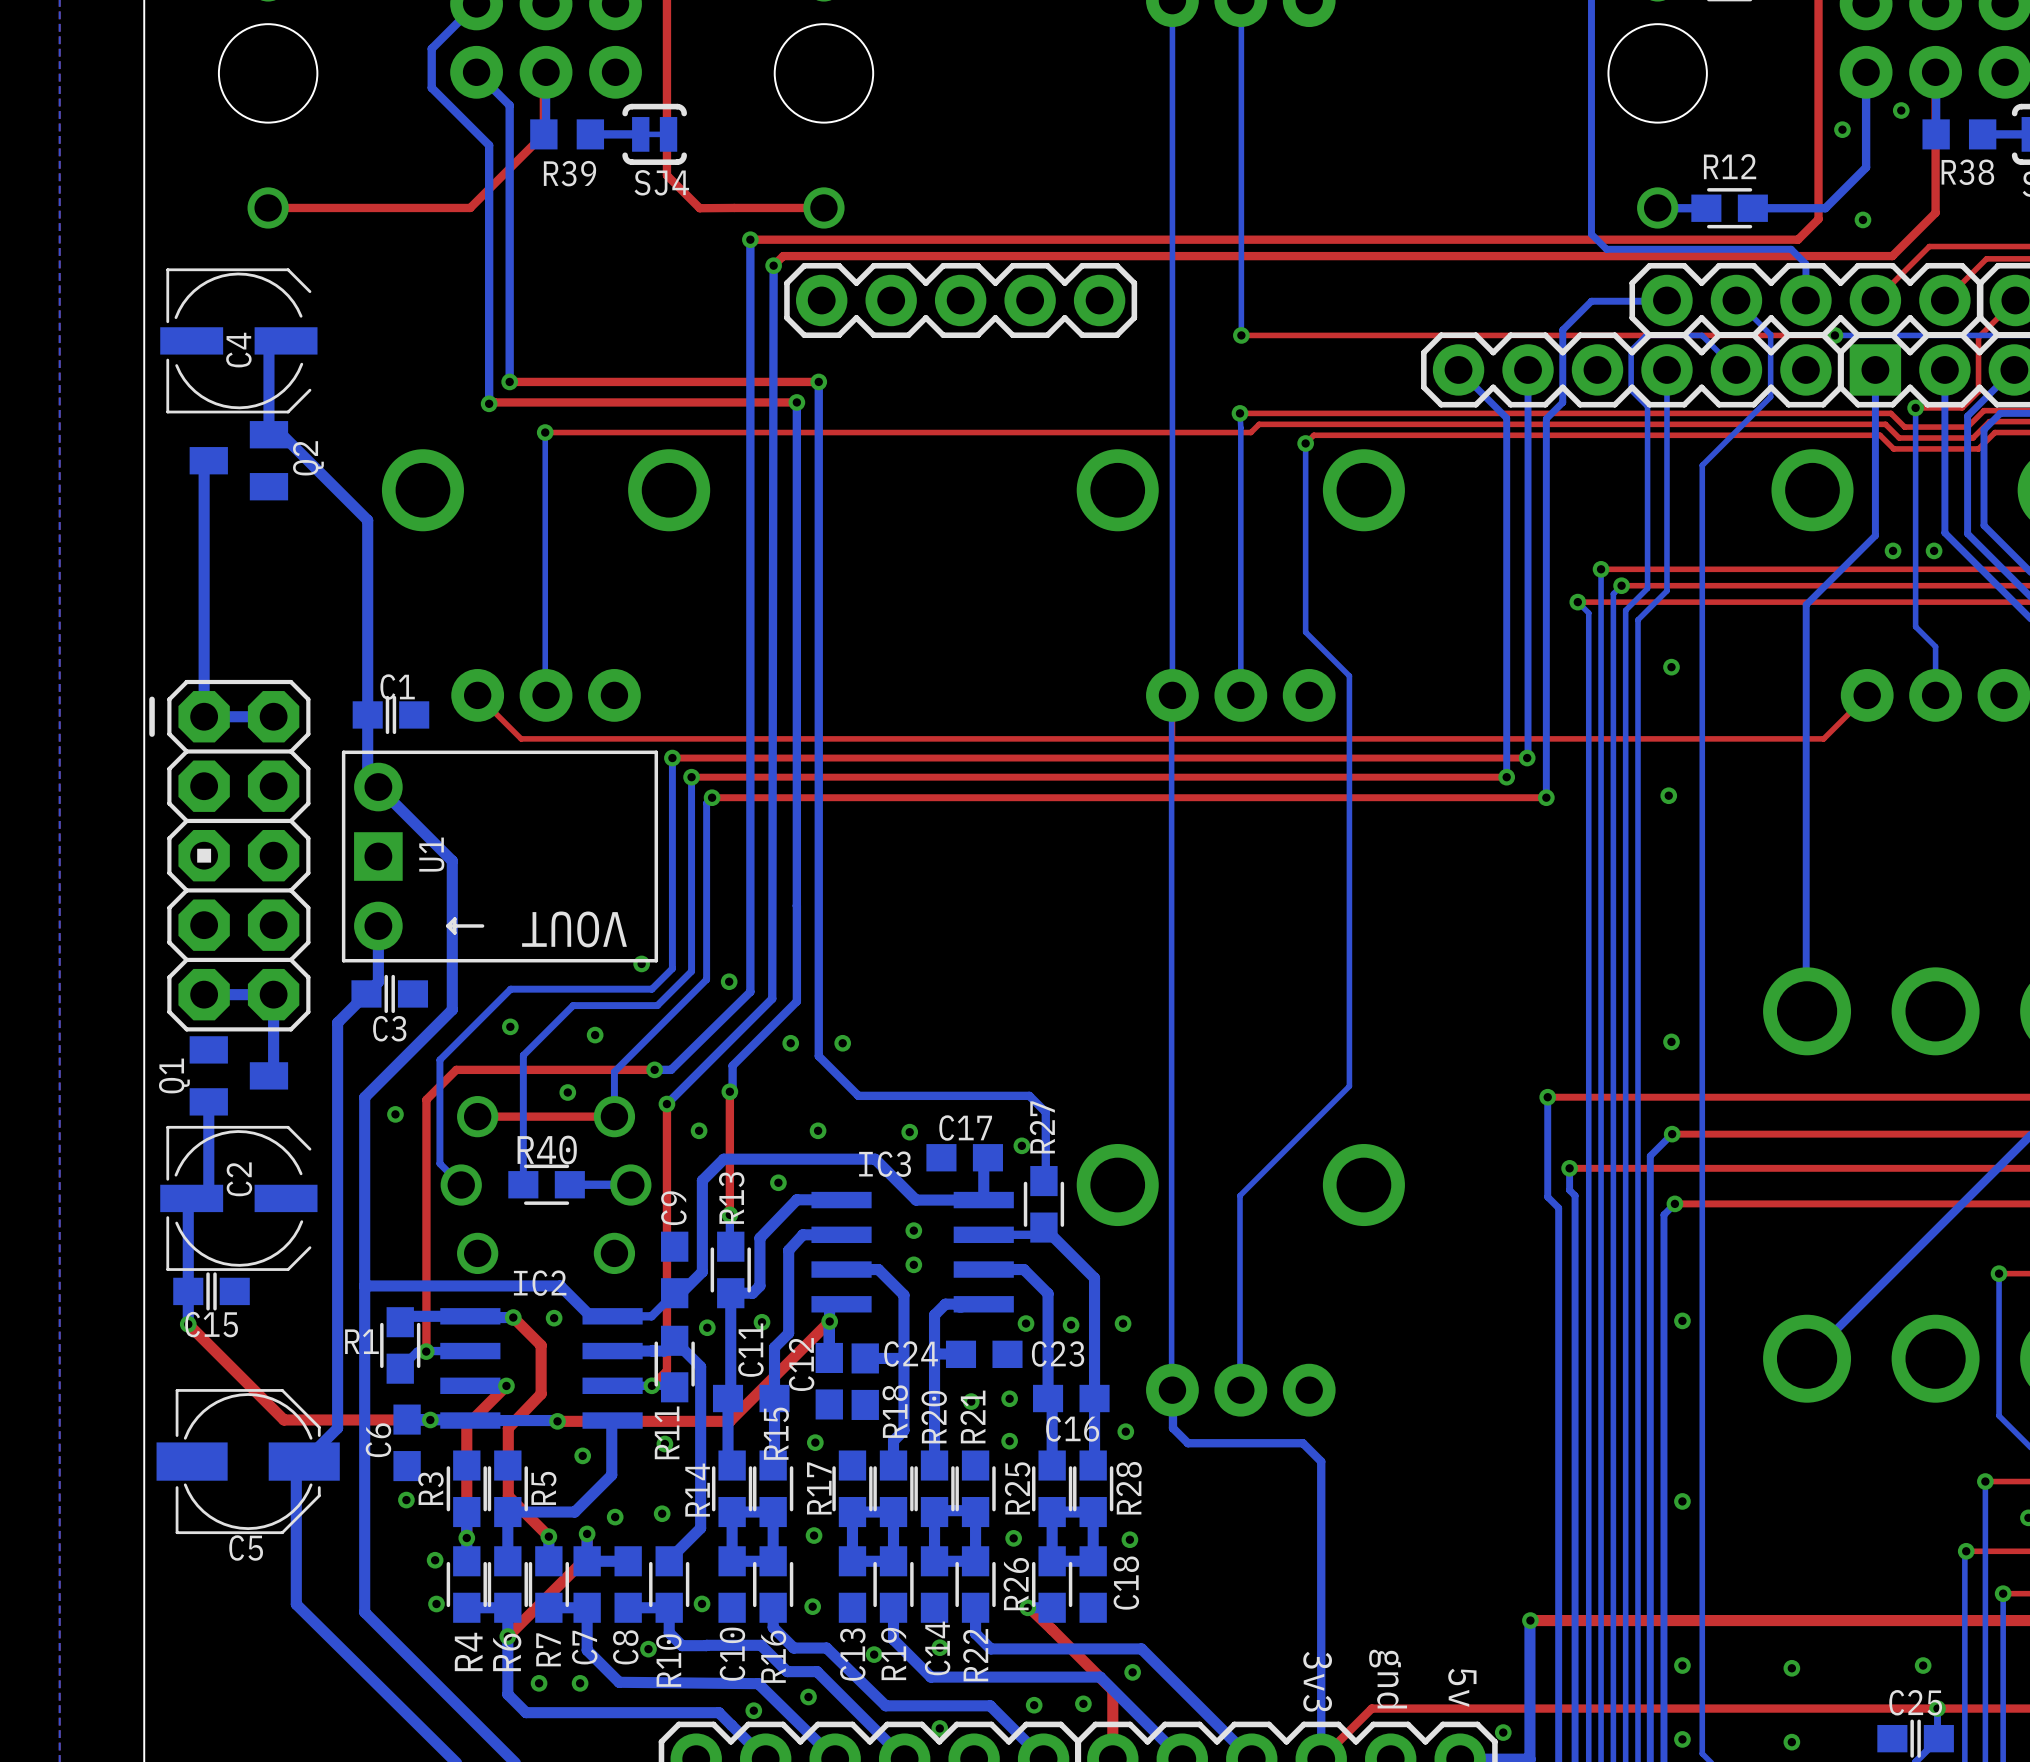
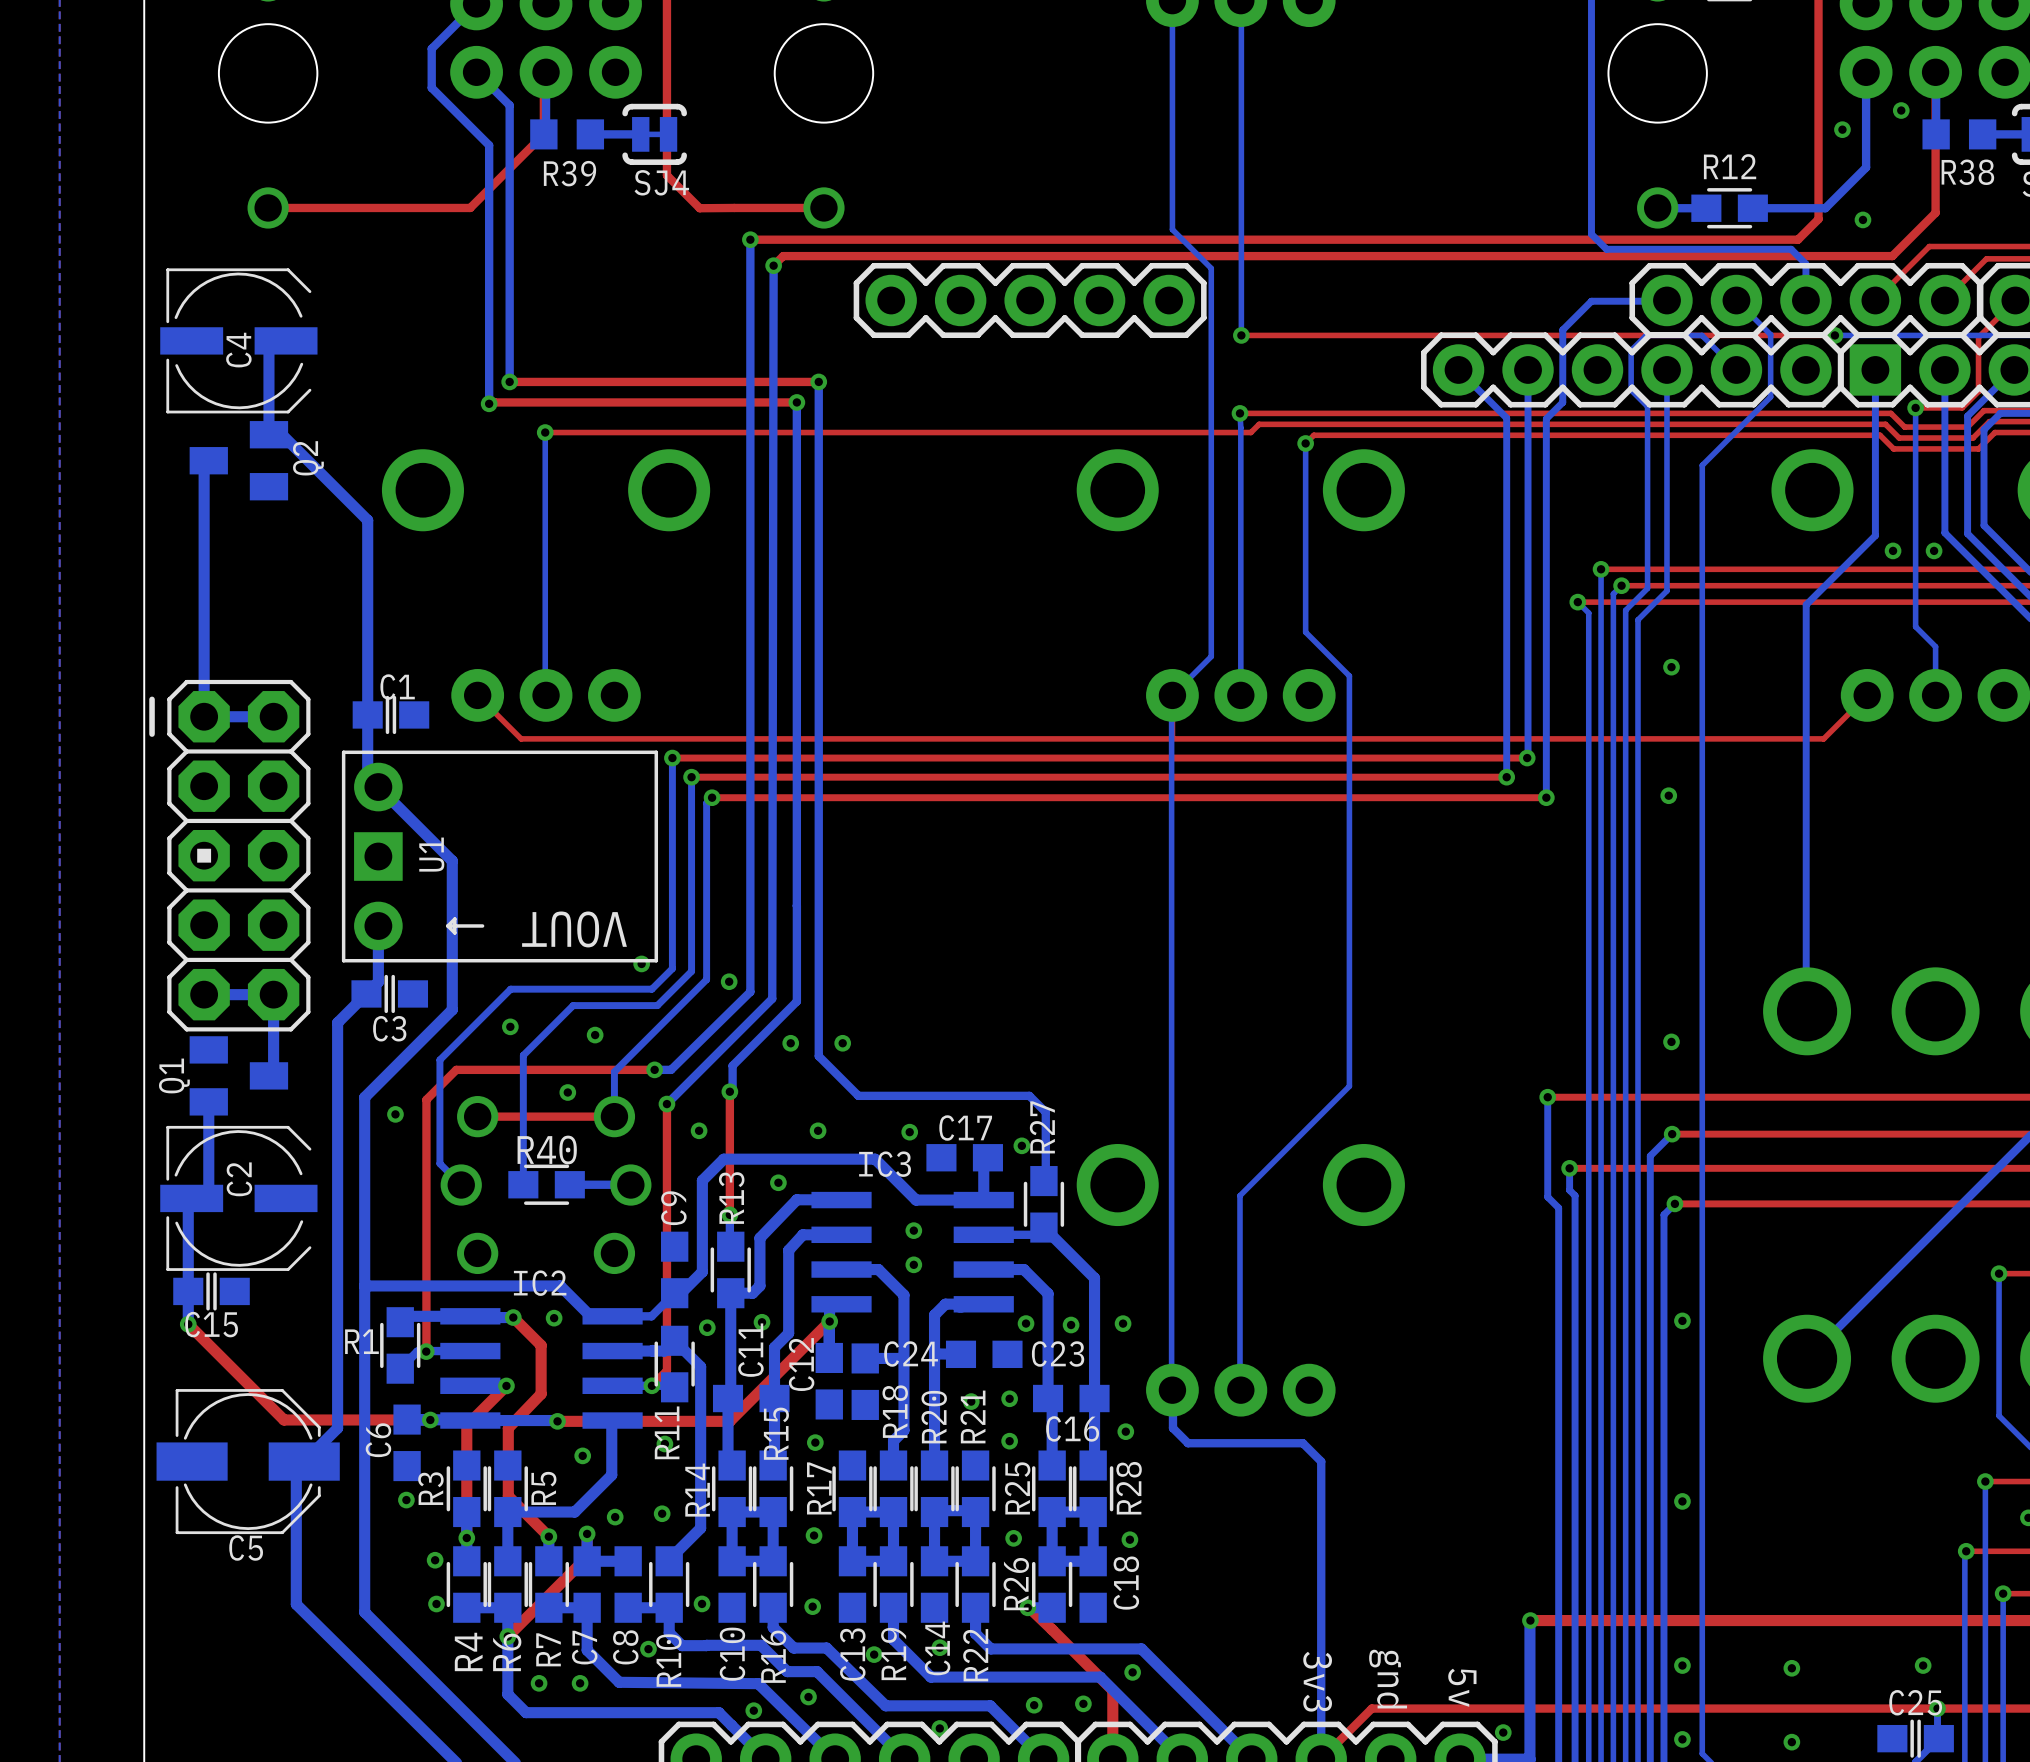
bottom track: (1172, 229) (1172, 695) -> (1172, 229) (1211, 268) (1211, 656) (1172, 695)
part position: (960, 300) -> (1030, 300)

